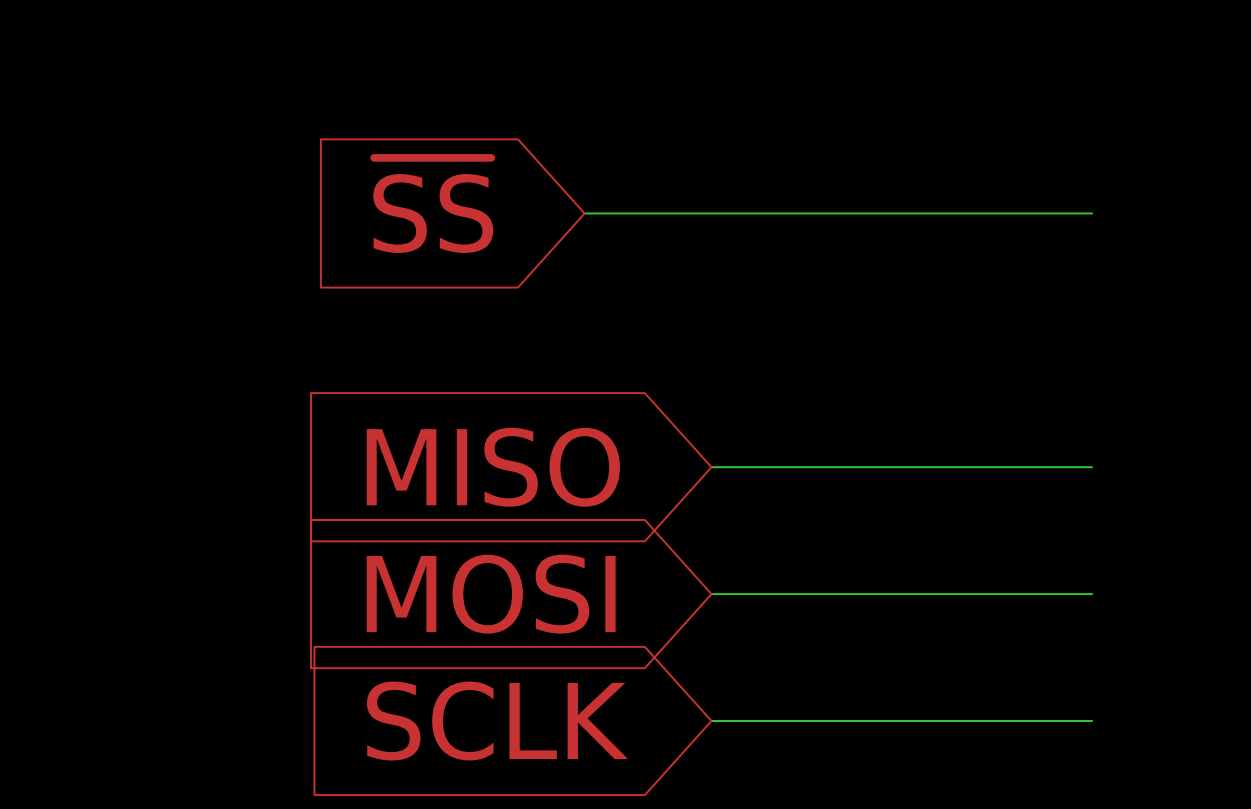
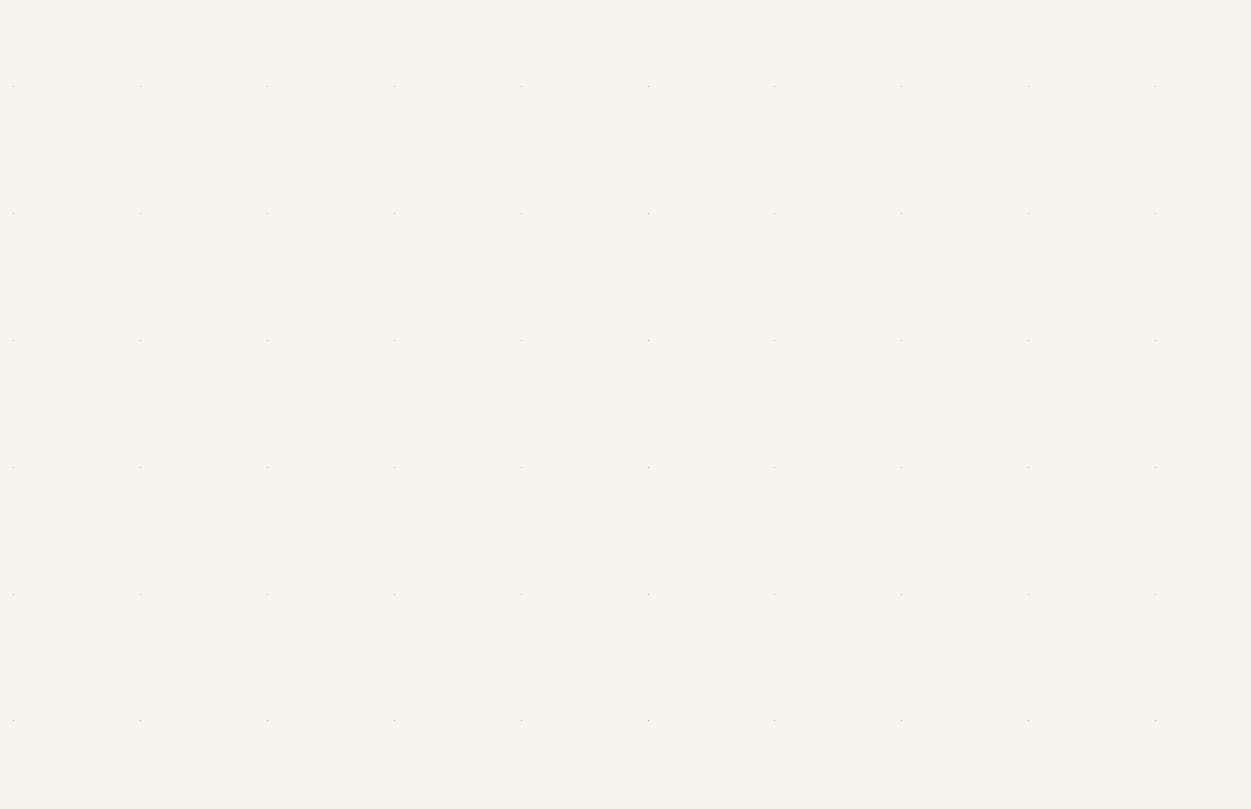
global label: ~{SS} (433, 205) -> none
wire: (584, 213) (1092, 213) -> none
global label: MISO (493, 467) -> none
wire: (711, 467) (1092, 467) -> none
global label: MOSI (491, 594) -> none
wire: (711, 594) (1092, 594) -> none
wire: (711, 720) (1092, 720) -> none
global label: SCLK (497, 721) -> none

